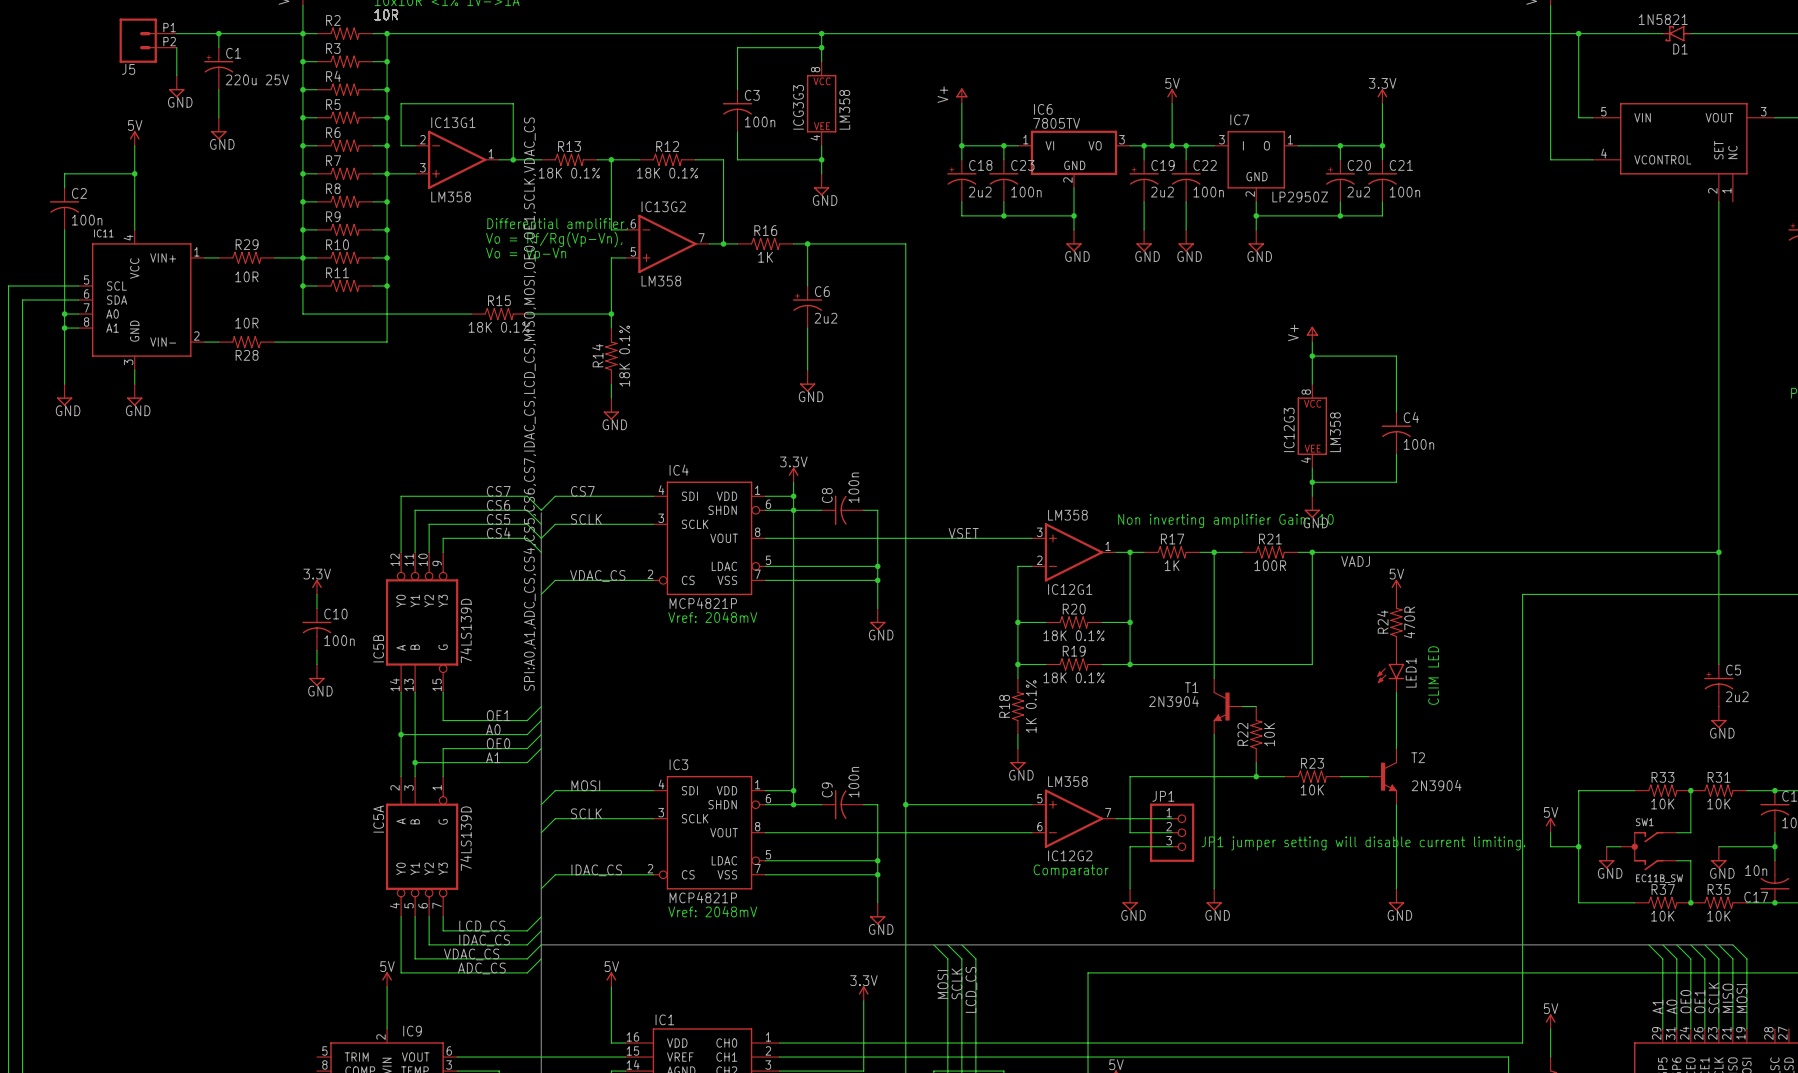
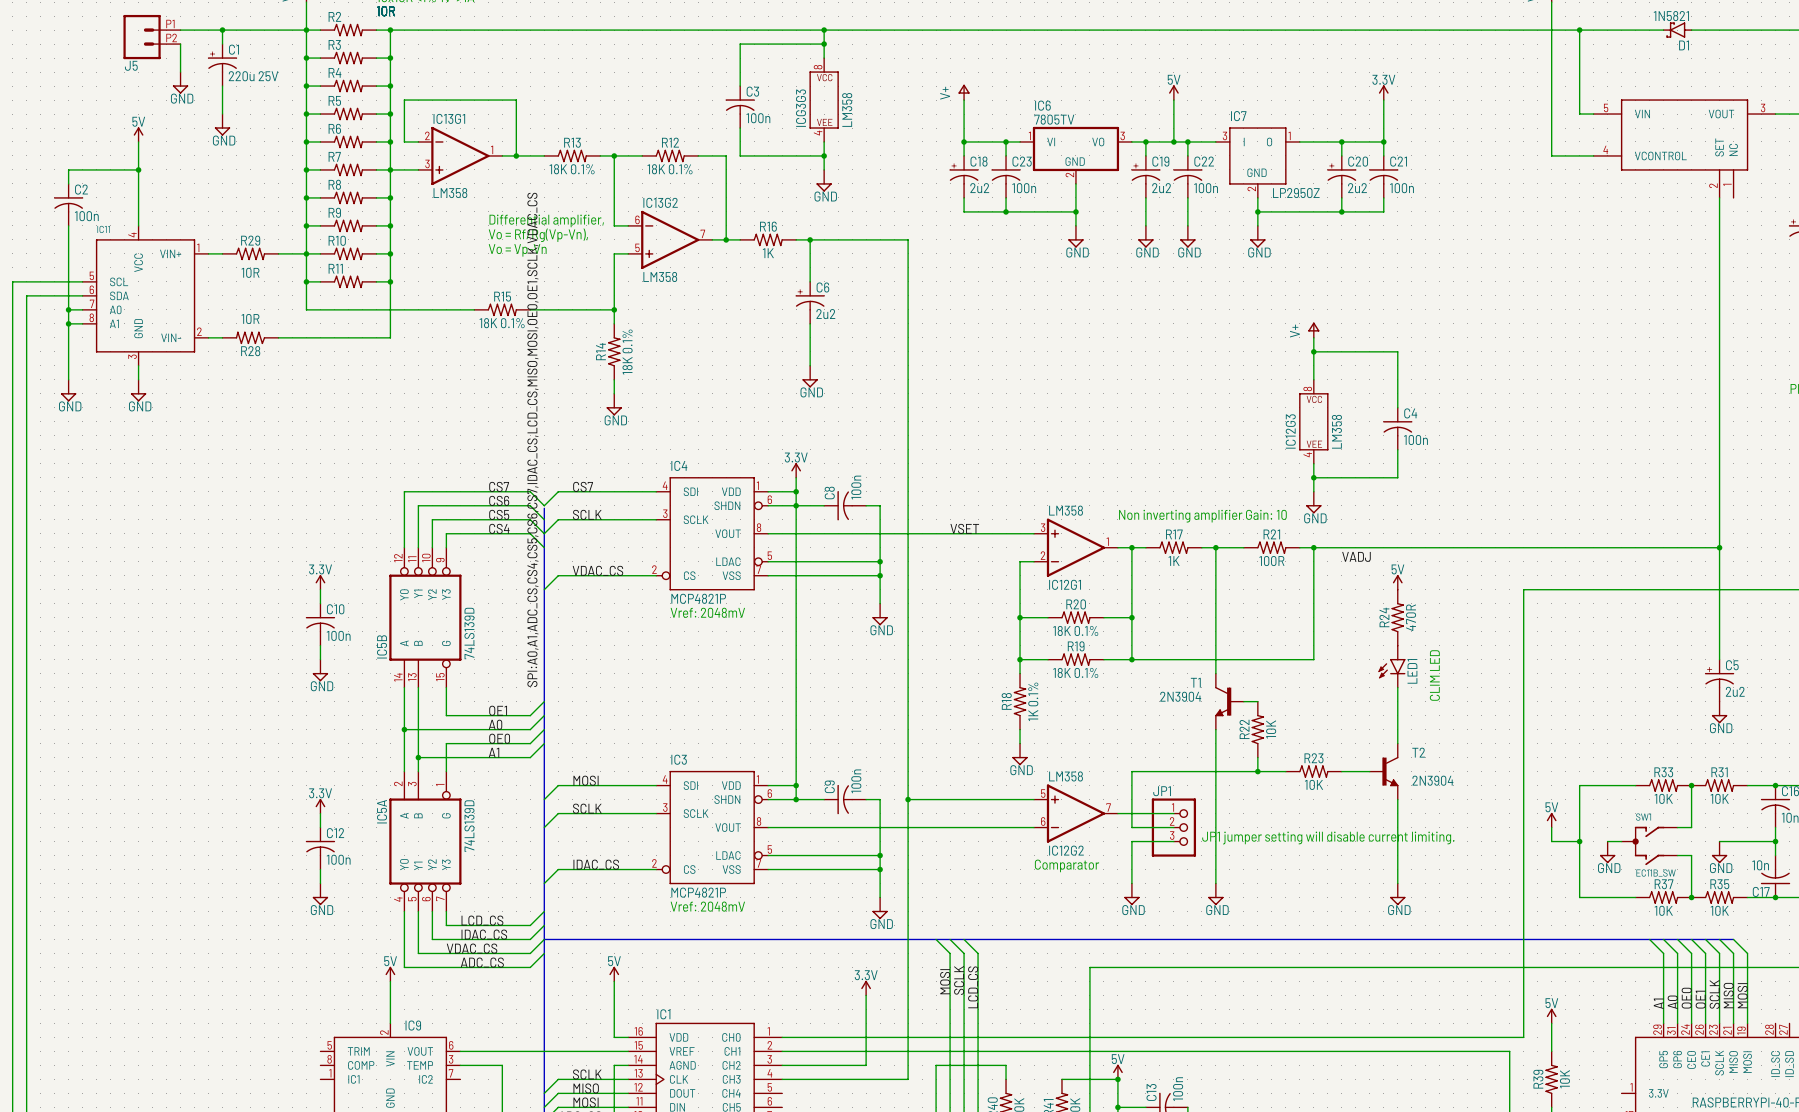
power symbol: none -> 3.3V (320, 806)
wire: none -> (320, 813) (320, 827)
C12: none -> 100n (320, 848)
wire: none -> (320, 869) (320, 883)
power symbol: none -> GND (320, 894)

